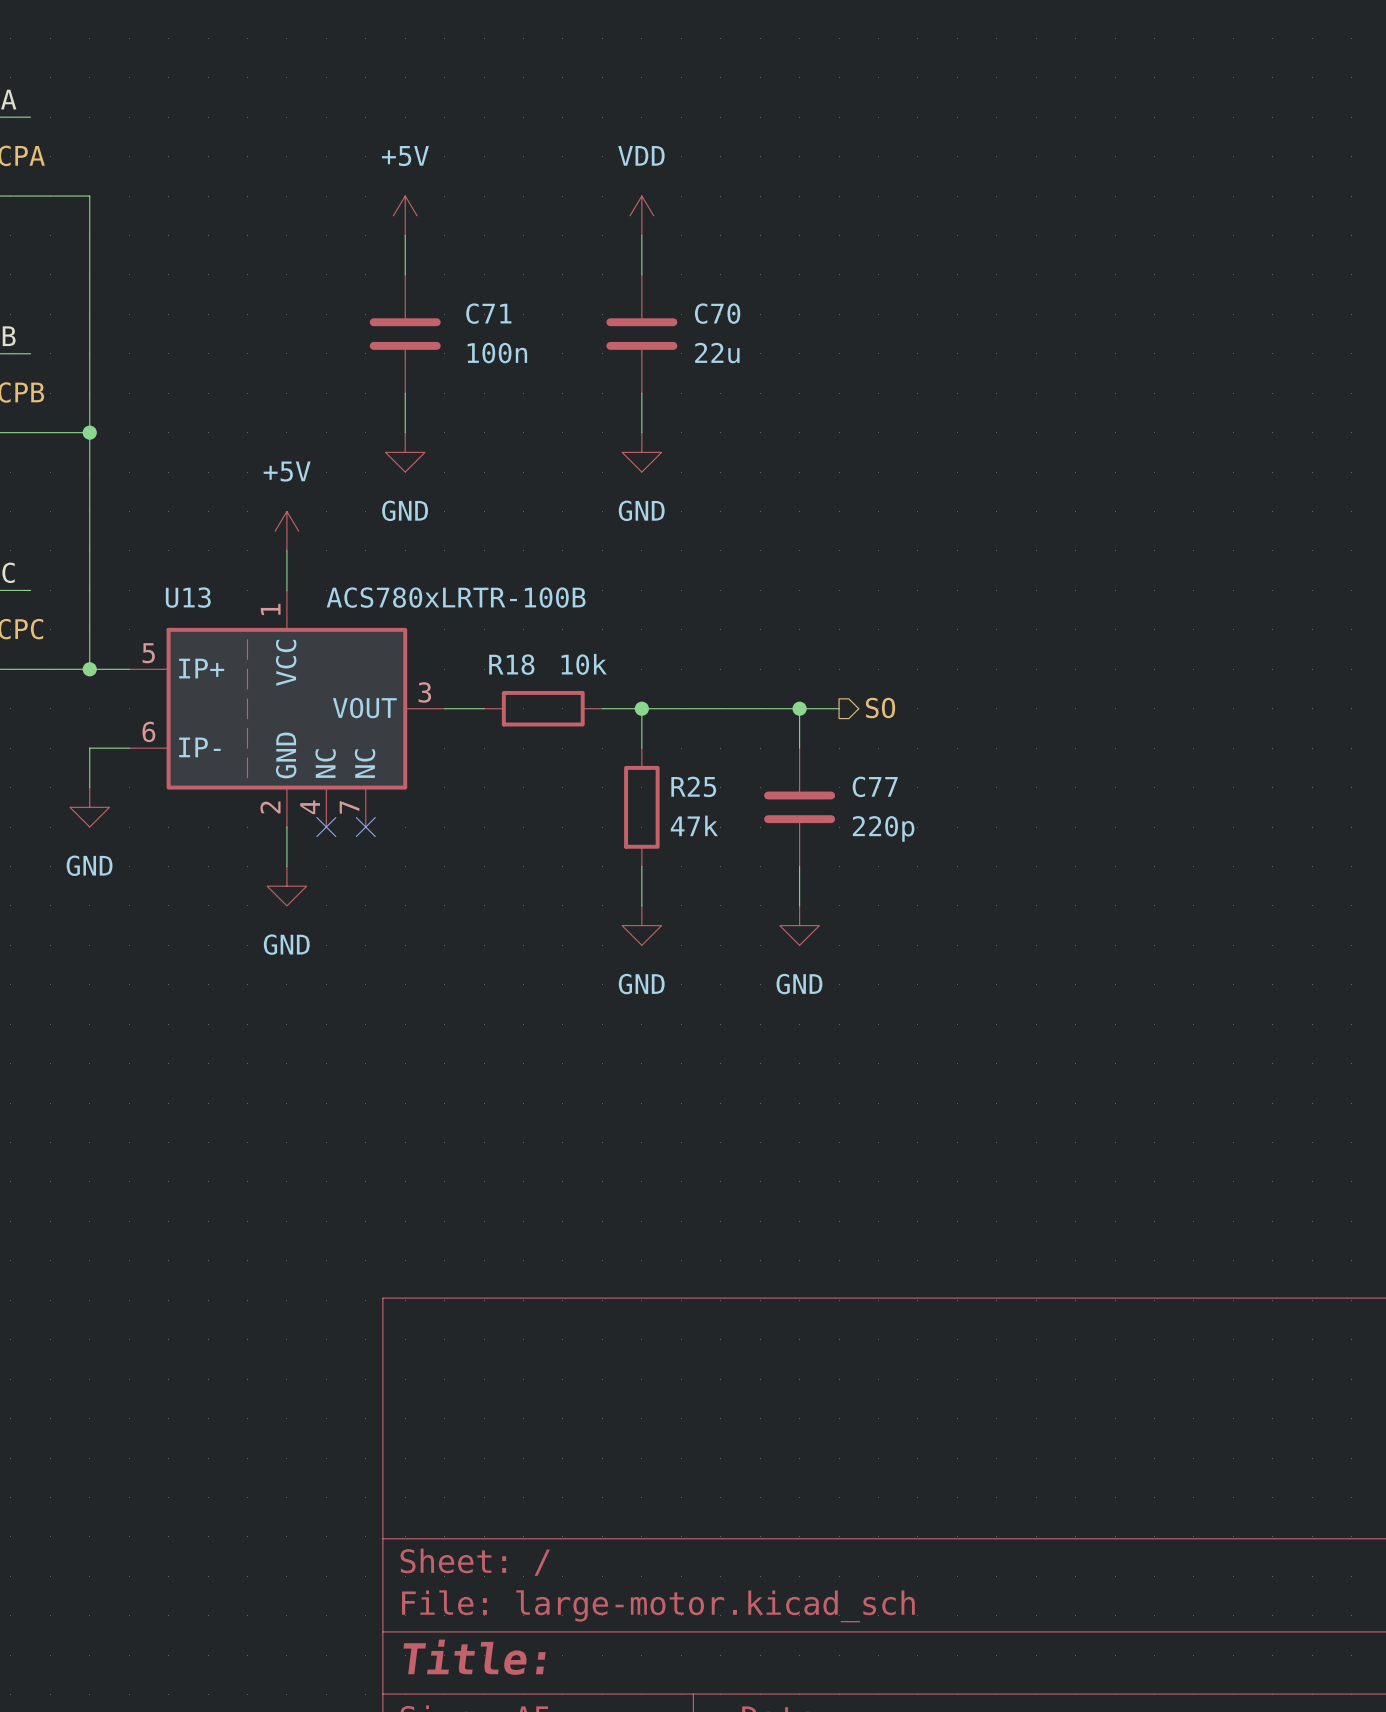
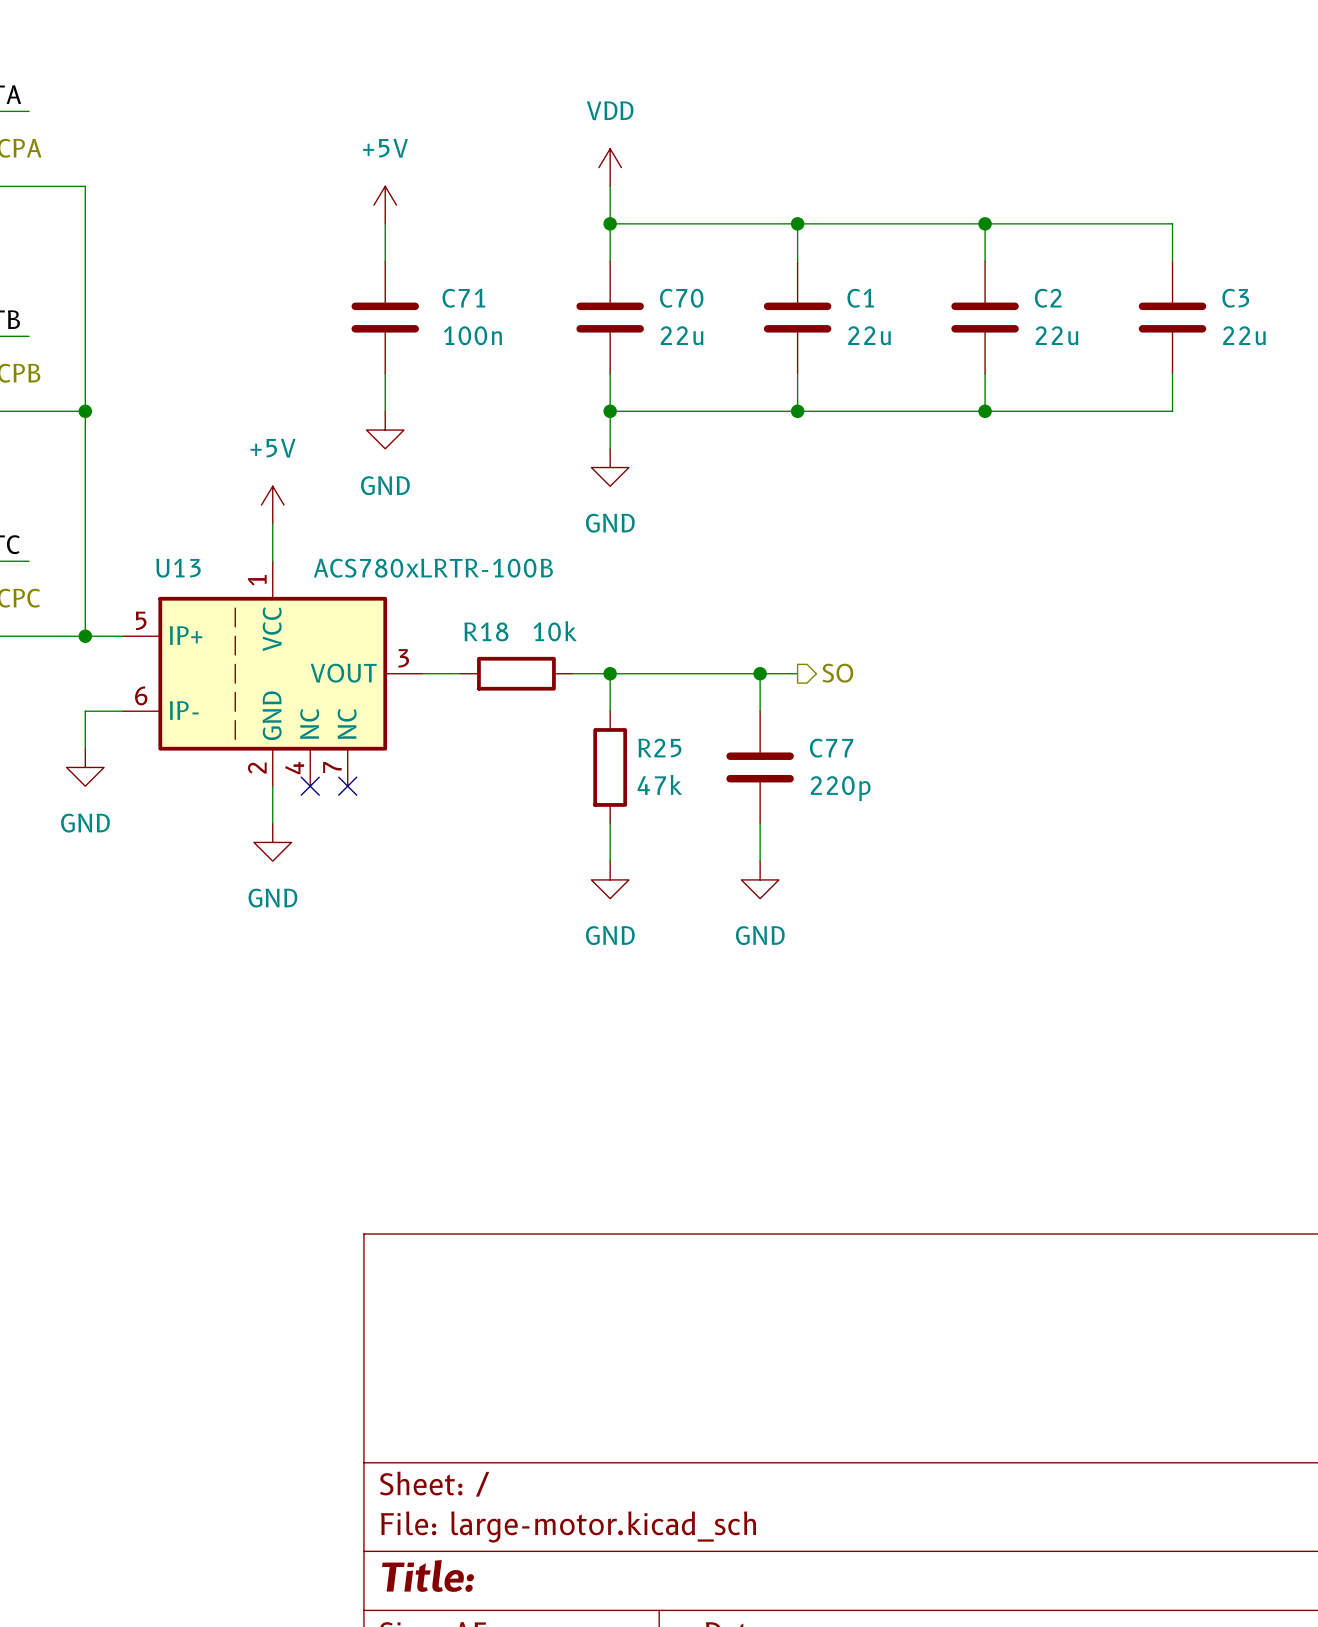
wire: none -> (610, 186) (610, 223) (1172, 223) (1172, 261)
power symbol position: VDD (641, 215) -> VDD (610, 167)
junction: none -> (610, 223)
wire: none -> (797, 223) (797, 261)
junction: none -> (797, 223)
wire: none -> (985, 223) (985, 261)
junction: none -> (985, 223)
C1: none -> 22u (797, 317)
C2: none -> 22u (985, 317)
C3: none -> 22u (1172, 317)
wire: none -> (797, 373) (797, 411)
wire: none -> (985, 373) (985, 411)
wire: none -> (1172, 373) (1172, 411) (610, 411) (610, 448)
junction: none -> (610, 411)
junction: none -> (797, 411)
junction: none -> (985, 411)
power symbol position: GND (641, 452) -> GND (610, 467)

